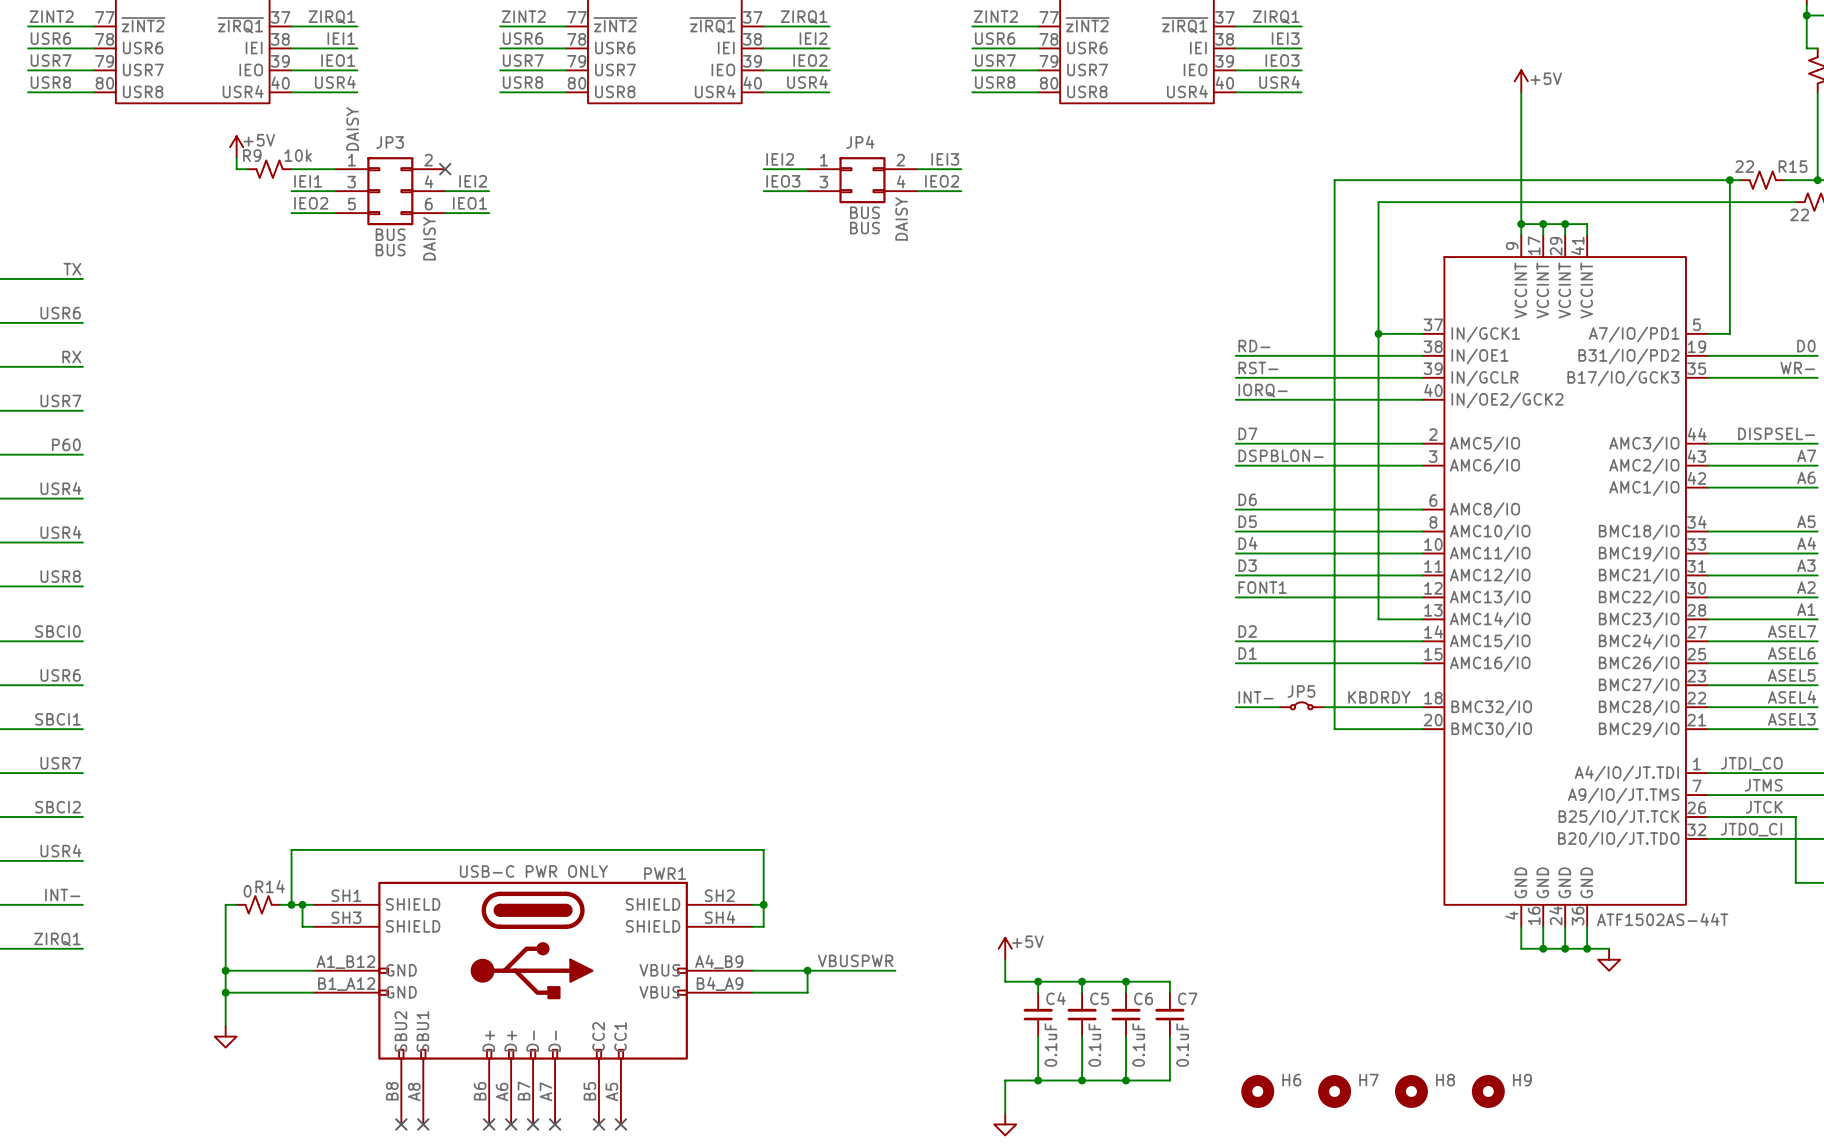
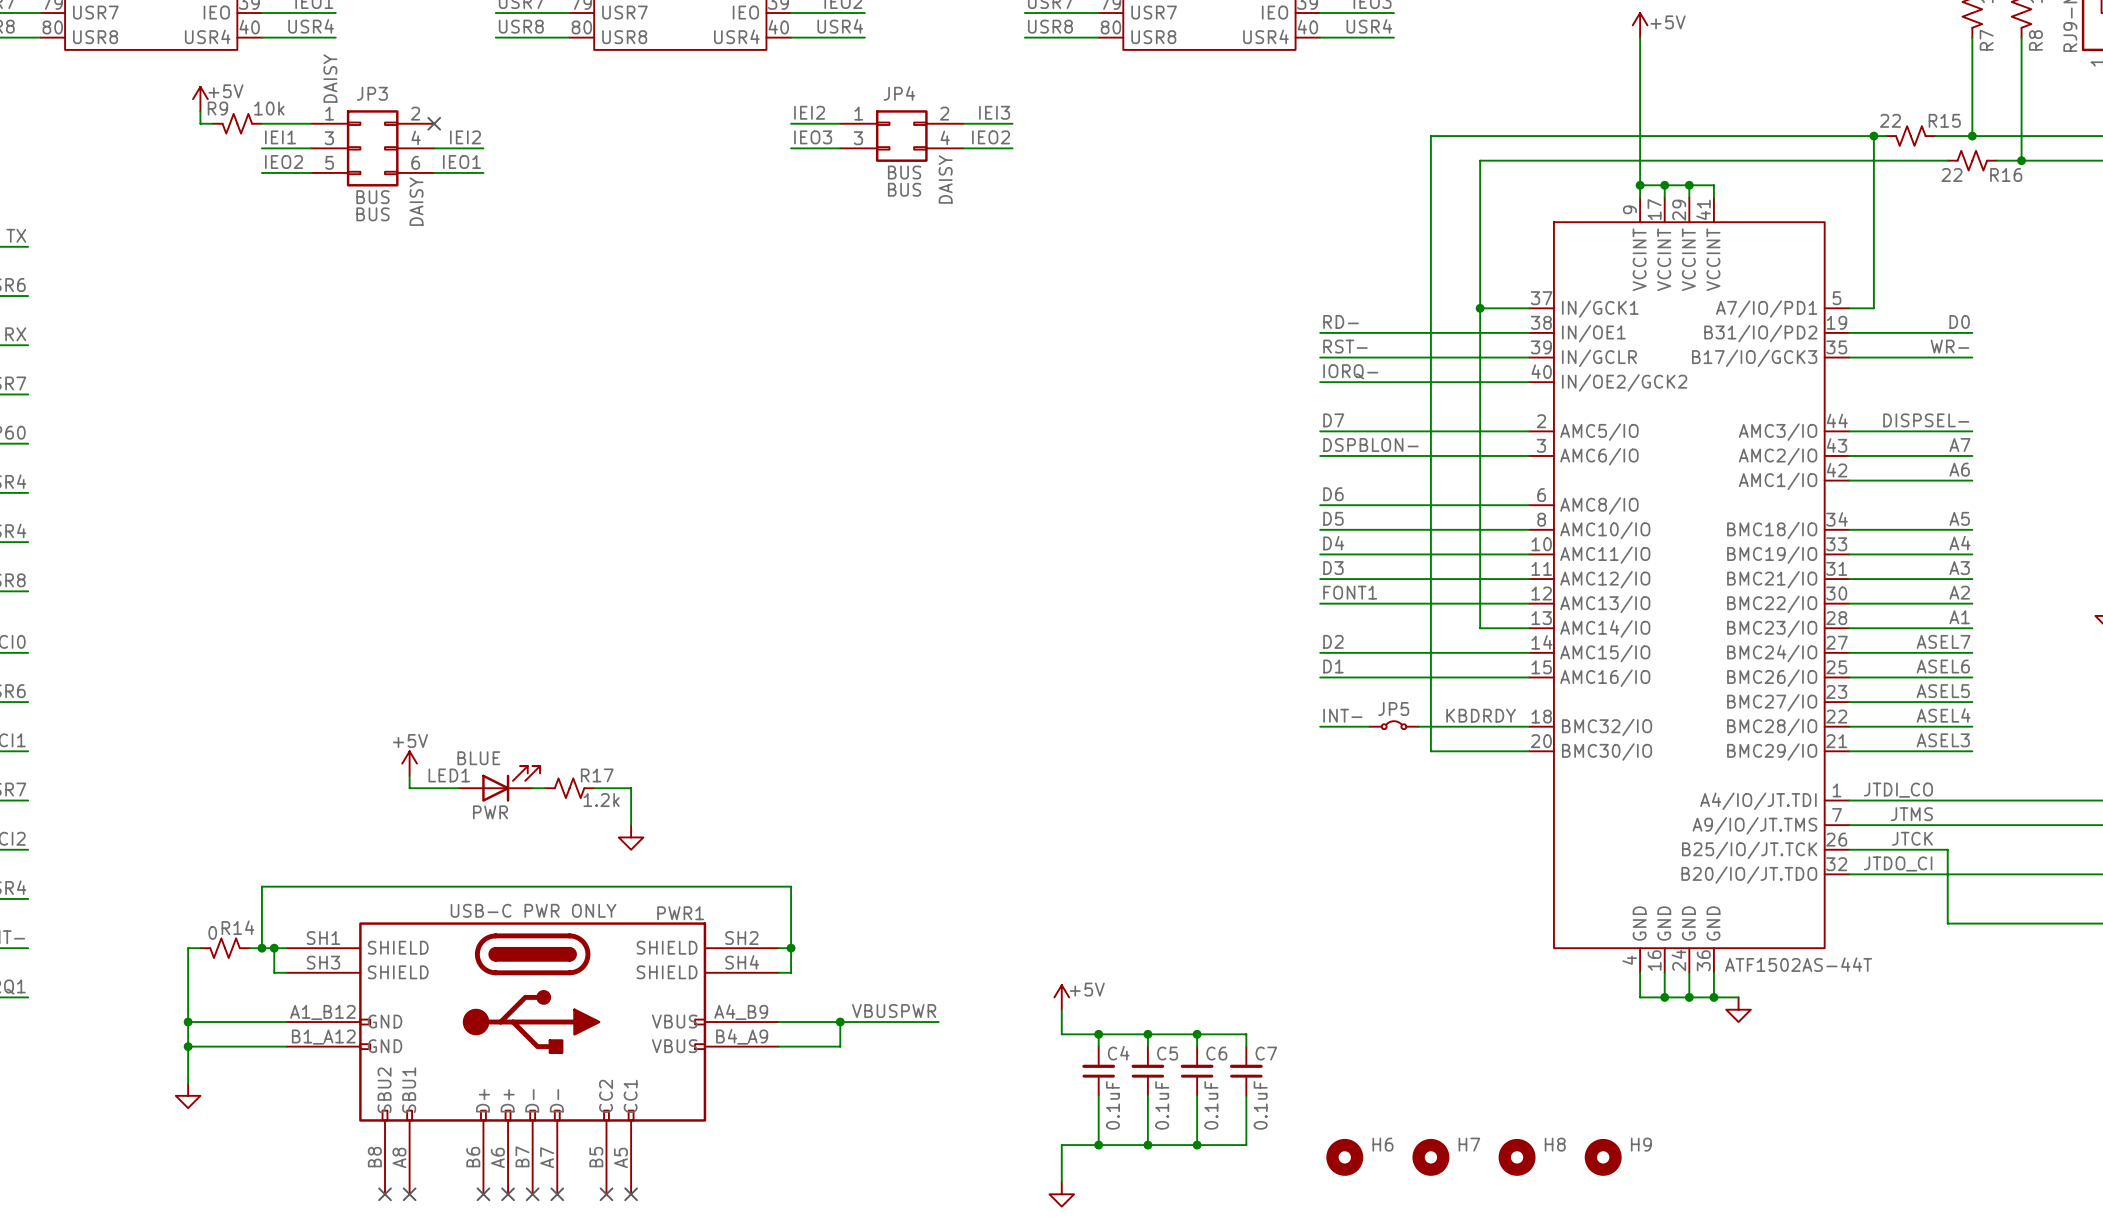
power symbol: none -> +5V (409, 763)
wire: none -> (409, 775) (409, 788) (458, 788)
LED1: none -> (499, 783)
wire: none -> (532, 788) (544, 788)
R17: none -> 1.2k (569, 788)
wire: none -> (594, 788) (631, 788) (631, 825)
power symbol: none -> (631, 837)

